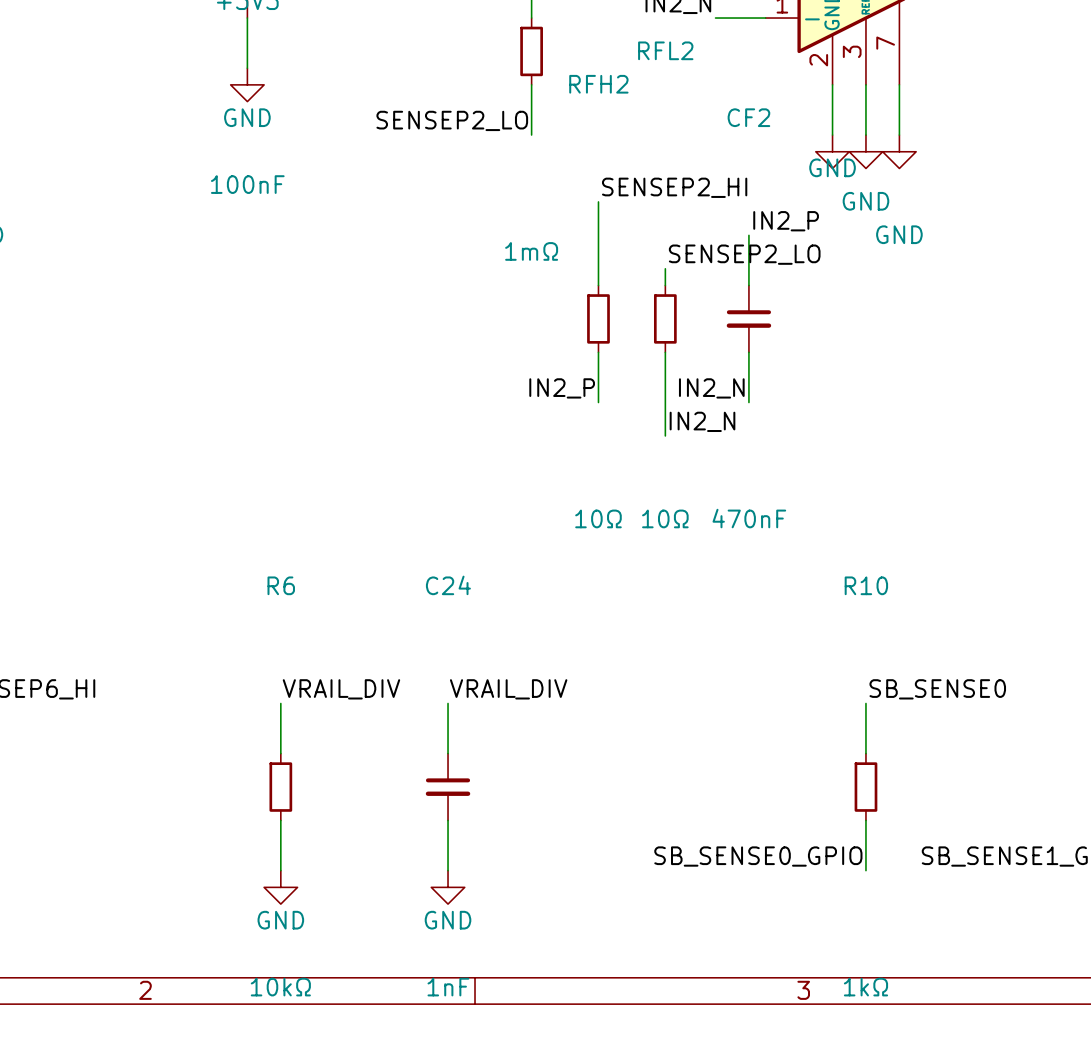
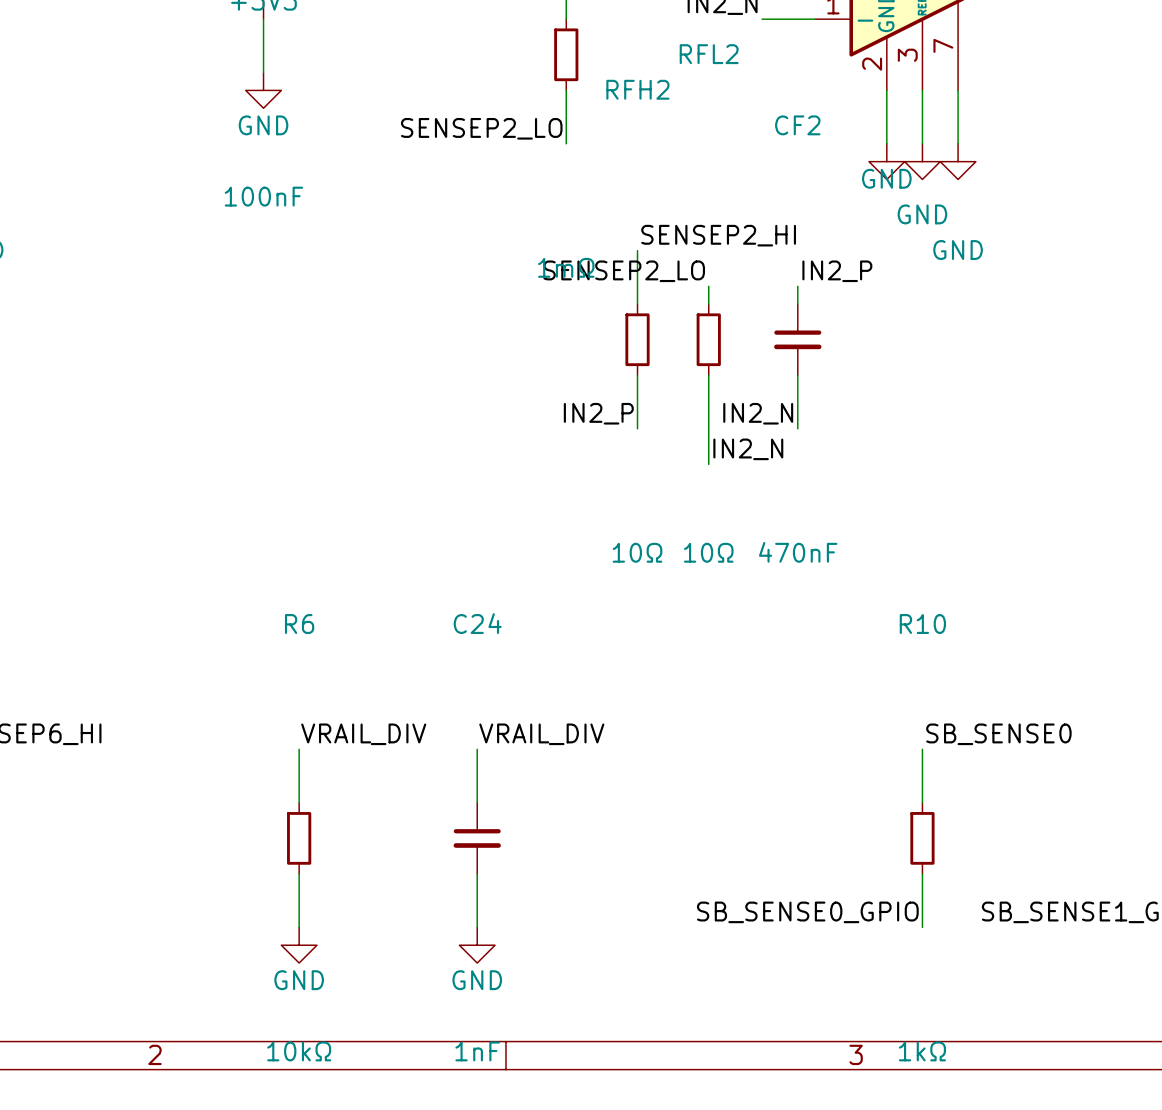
label position: SENSEP2_HI (674, 187) -> SENSEP2_HI (718, 235)
wire: (598, 201) (598, 235) -> none
label position: IN2_P (786, 221) -> IN2_P (837, 271)
wire: (748, 235) (748, 268) -> none
label position: SENSEP2_LO (744, 254) -> SENSEP2_LO (624, 271)

